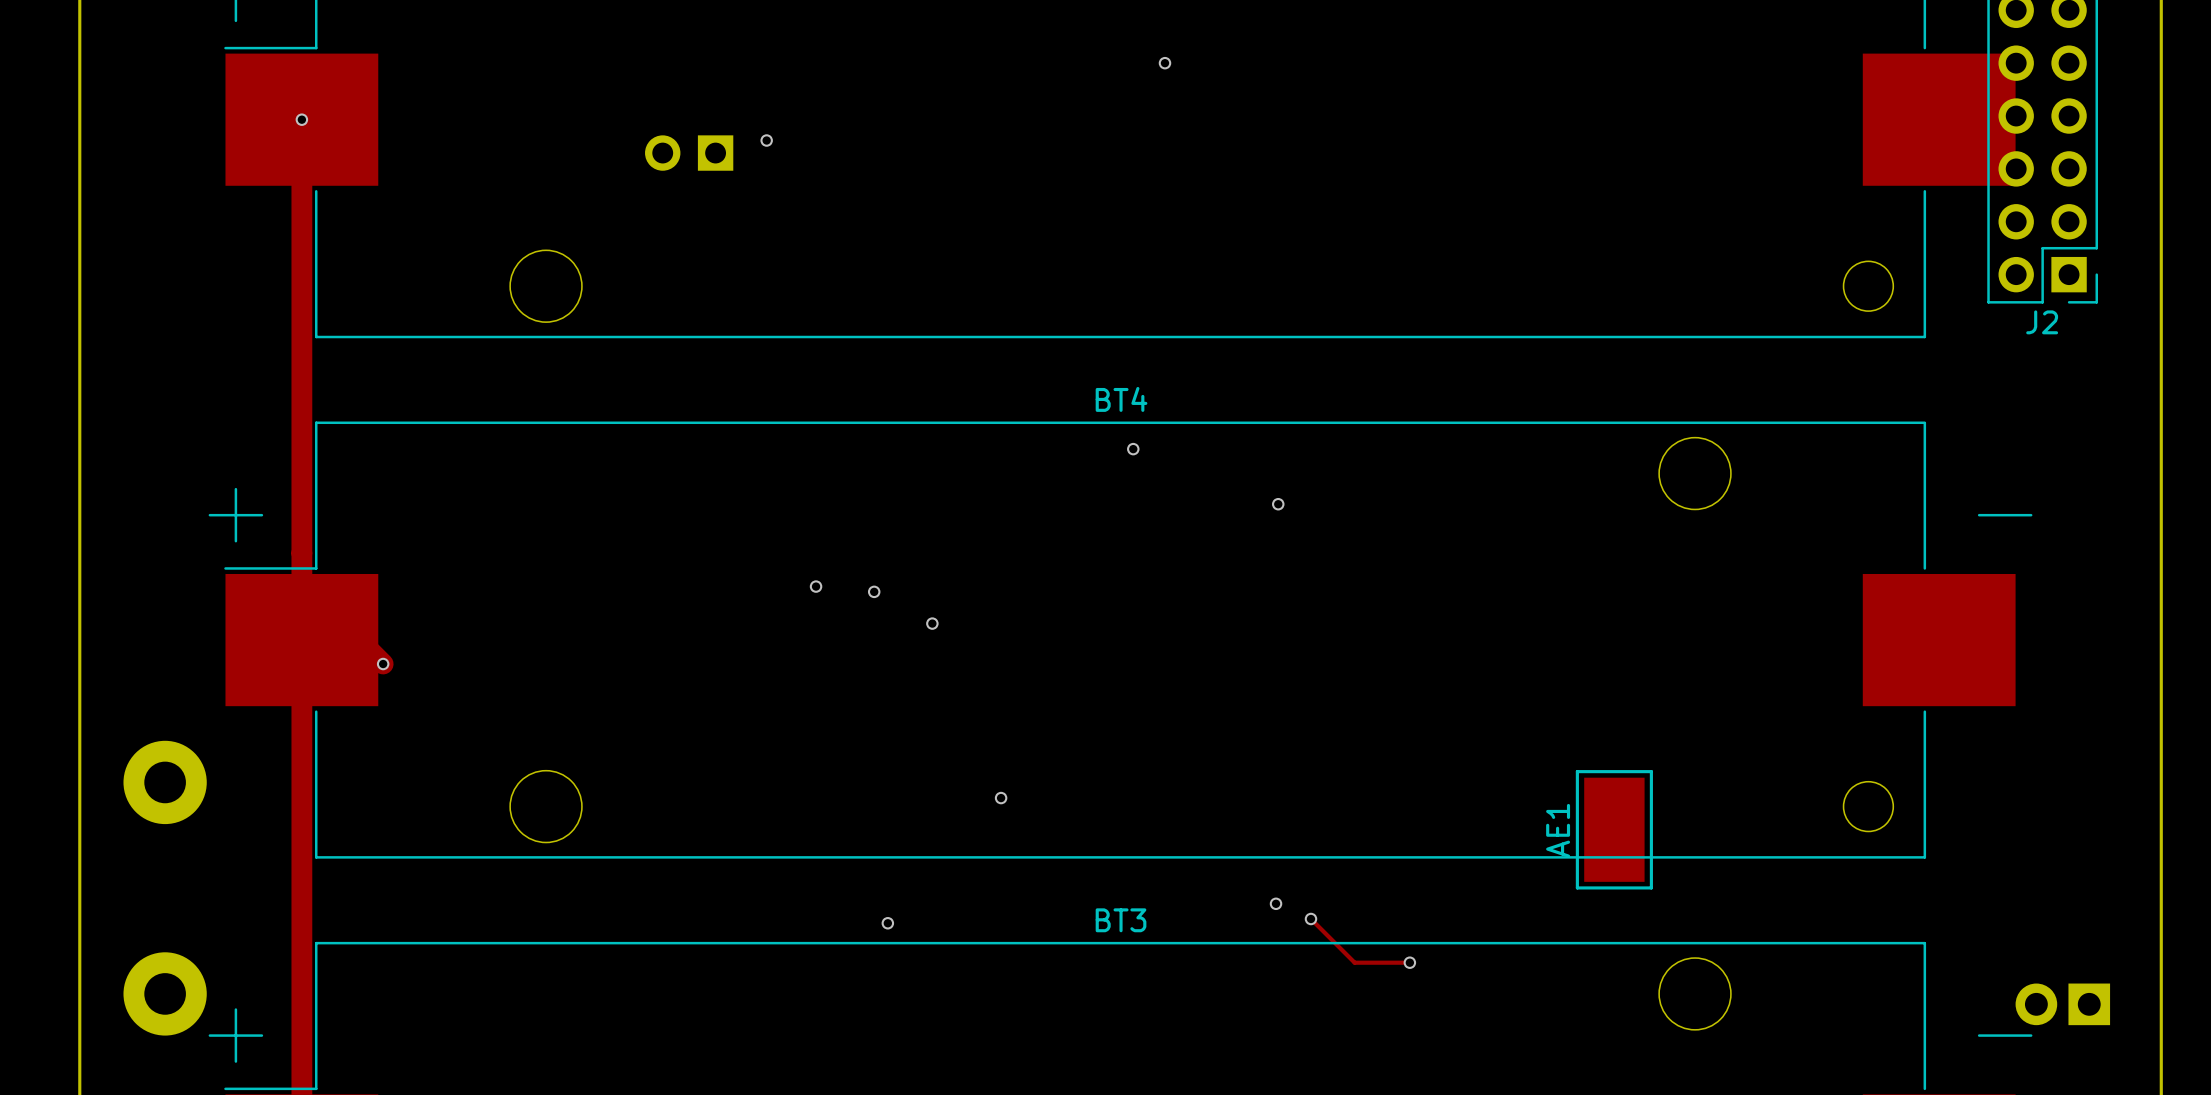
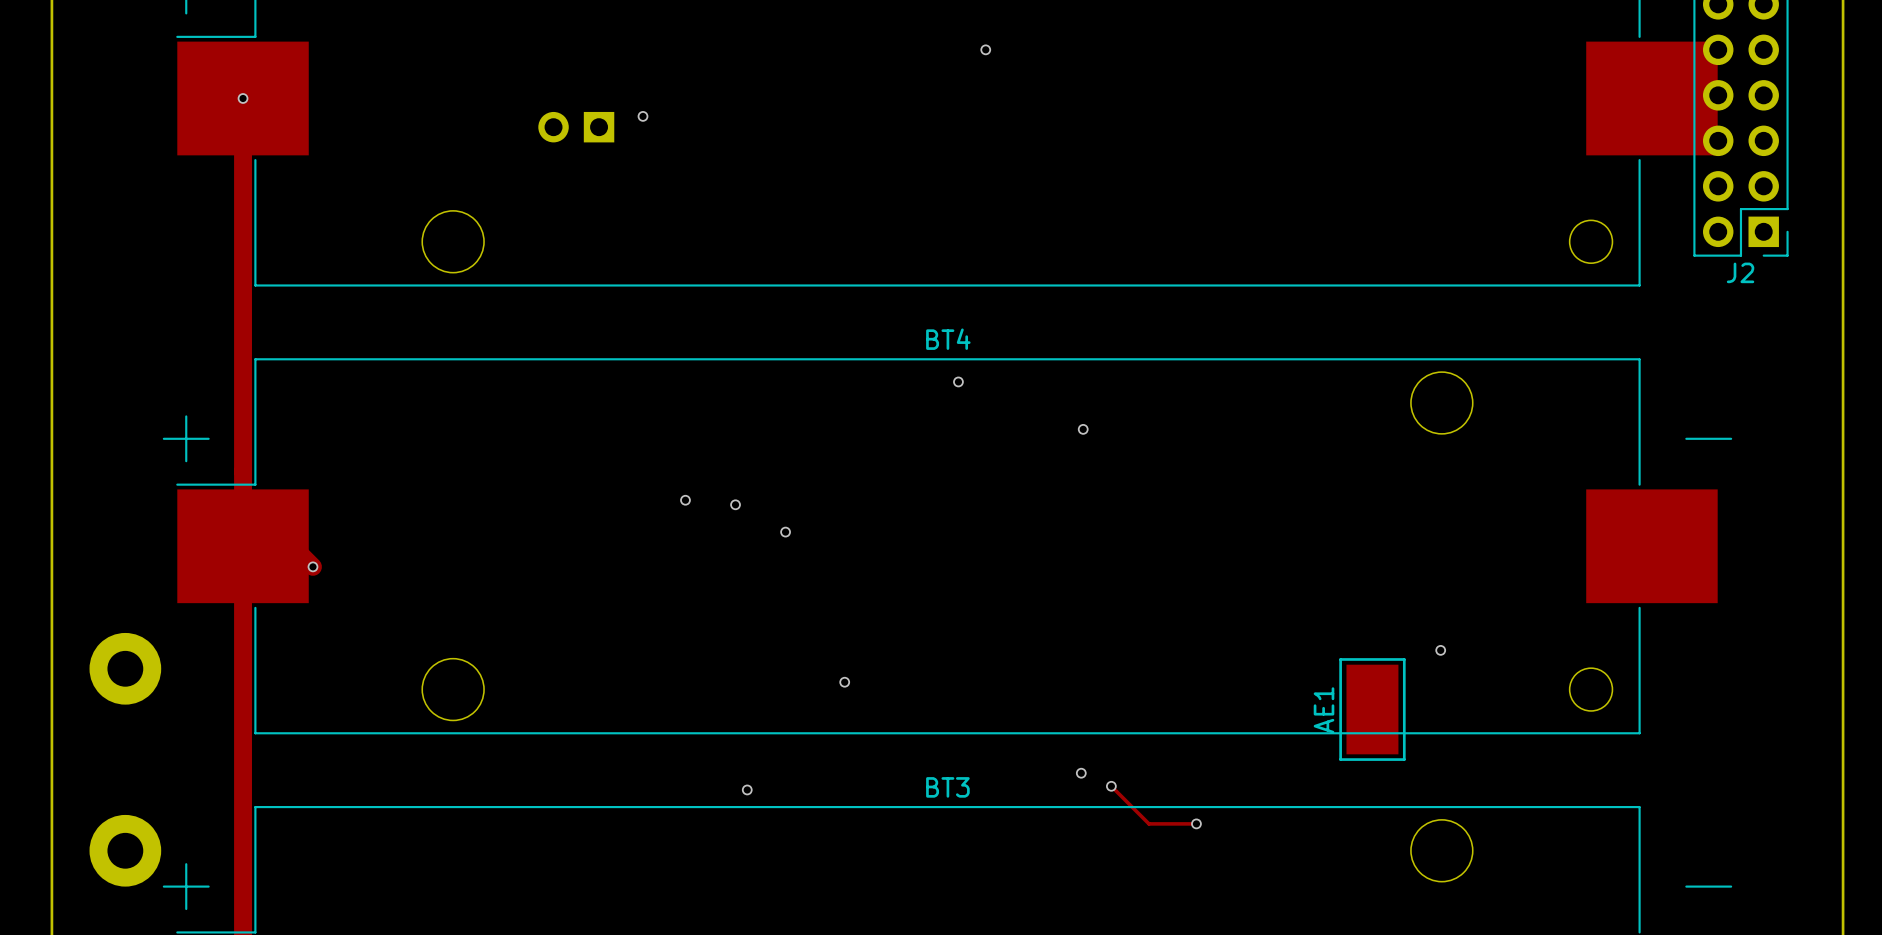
via: none -> (1440, 650)
part: (2062, 1004) -> none

